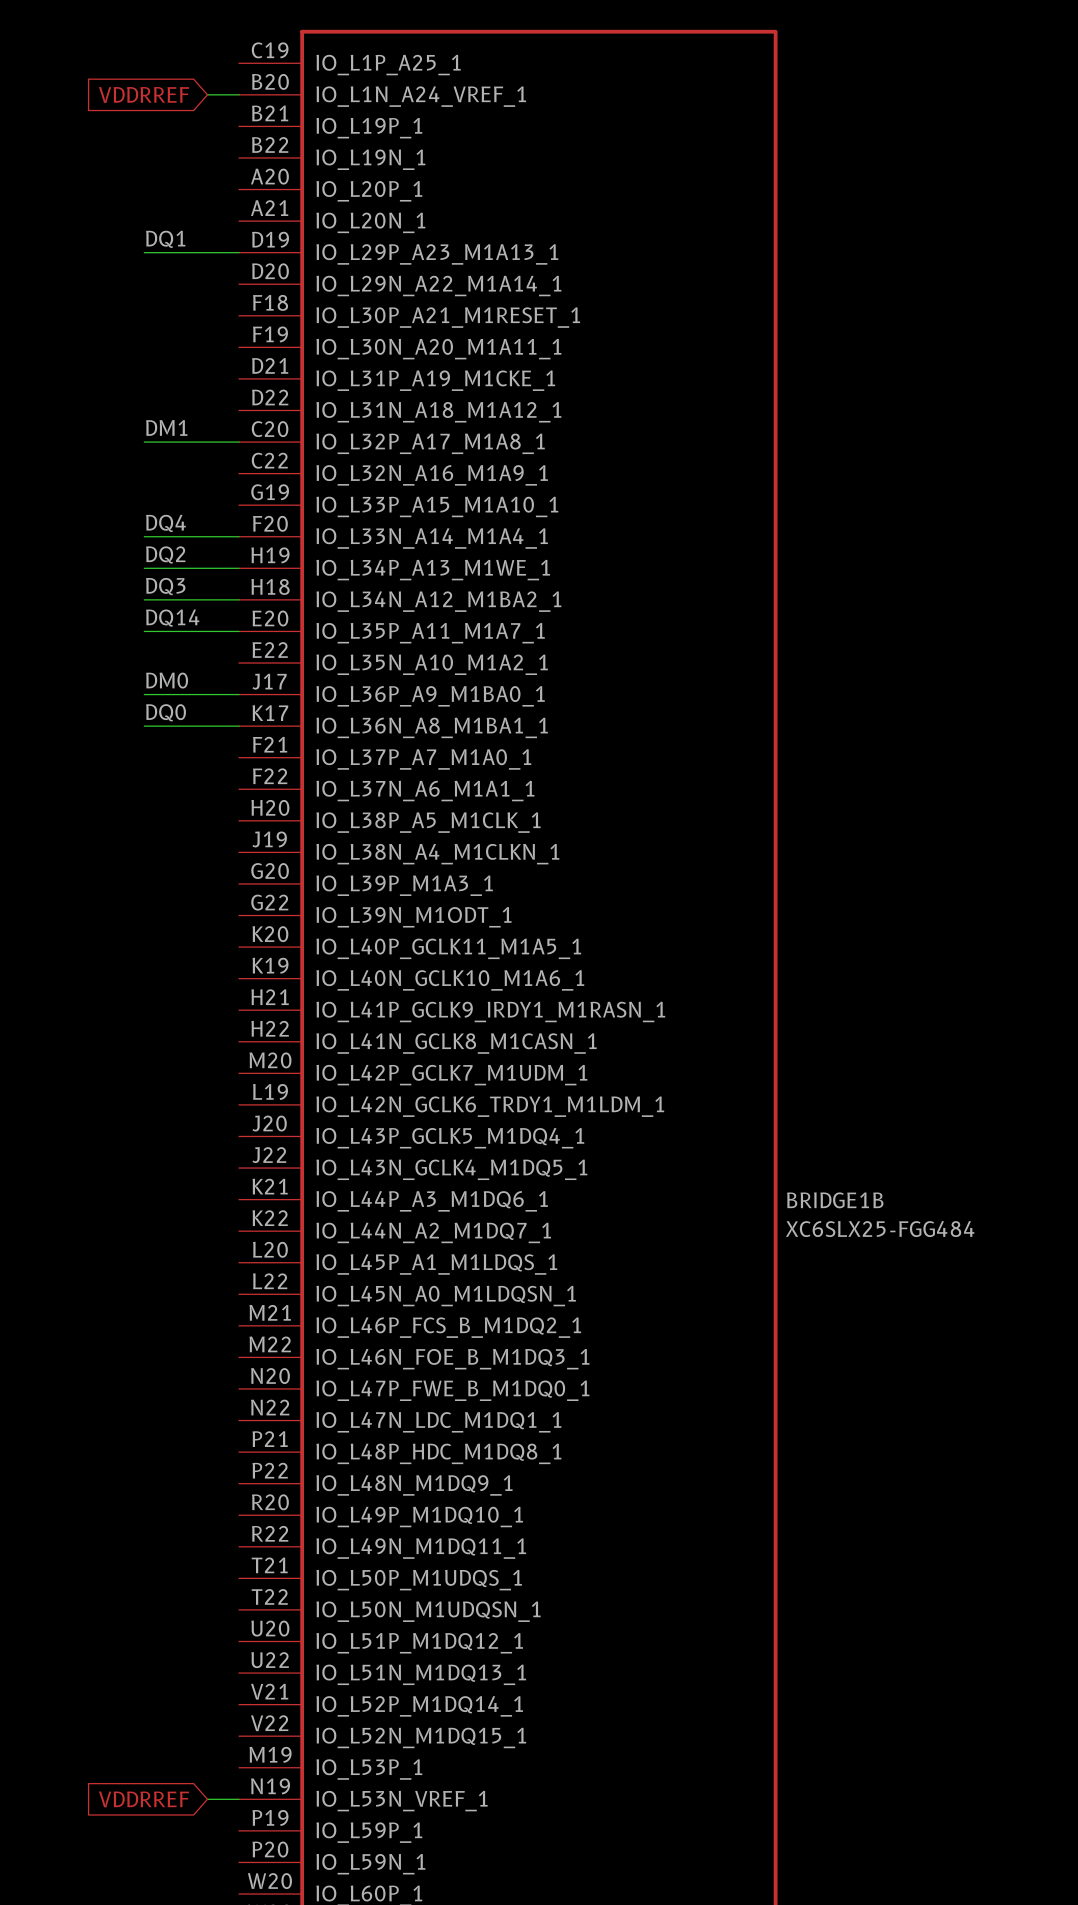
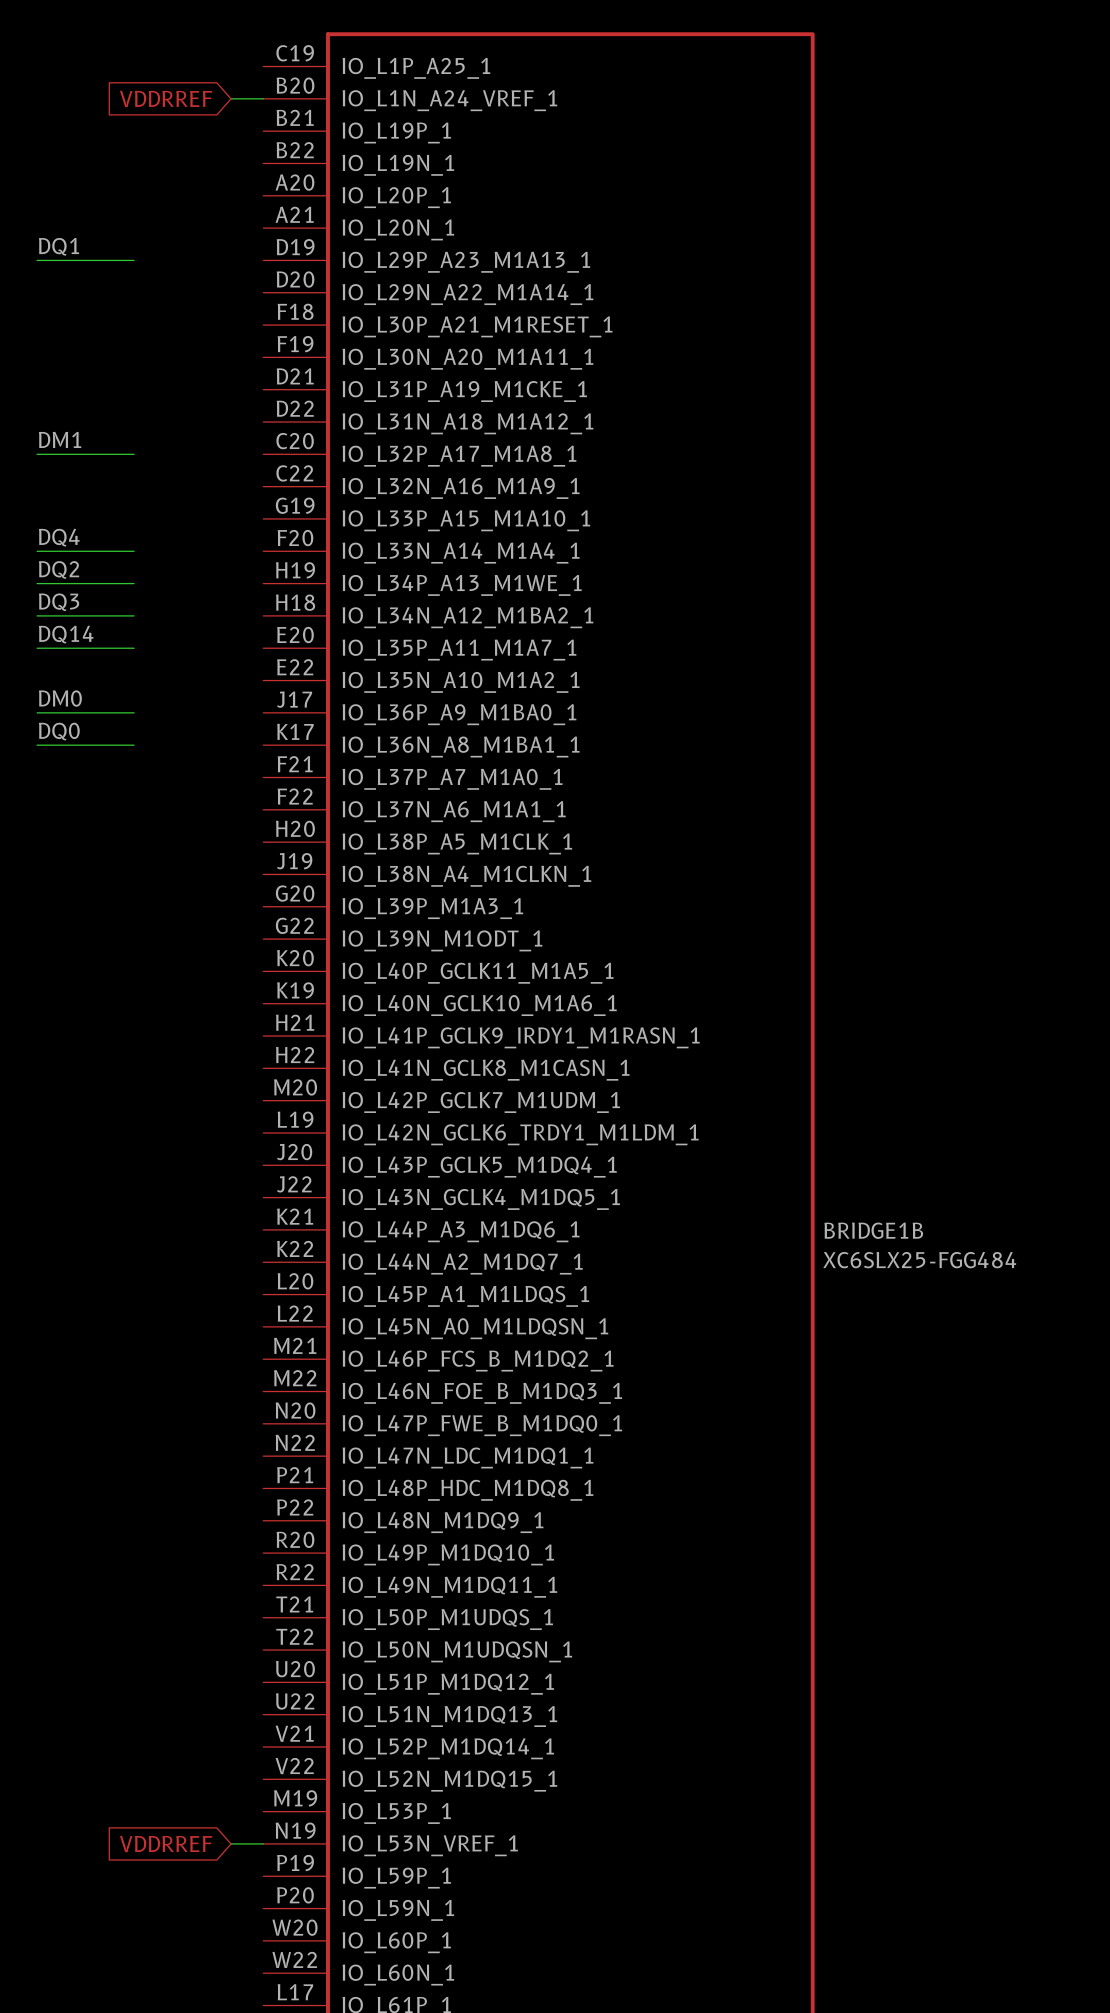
label position: DQ1 (165, 239) -> DQ1 (59, 246)
wire: (144, 252) (239, 252) -> (37, 260) (134, 260)
label position: DM1 (166, 427) -> DM1 (60, 439)
wire: (144, 442) (239, 442) -> (37, 454) (134, 454)
label position: DQ4 (165, 523) -> DQ4 (59, 537)
wire: (144, 536) (239, 536) -> (37, 551) (134, 551)
label position: DQ2 (165, 554) -> DQ2 (59, 569)
wire: (144, 568) (239, 568) -> (37, 583) (134, 583)
label position: DQ3 (165, 586) -> DQ3 (59, 602)
wire: (144, 599) (239, 599) -> (37, 615) (134, 615)
label position: DQ14 (172, 618) -> DQ14 (66, 634)
wire: (144, 631) (239, 631) -> (37, 648) (134, 648)
label position: DM0 (167, 680) -> DM0 (60, 698)
wire: (144, 694) (239, 694) -> (37, 712) (134, 712)
label position: DQ0 (166, 712) -> DQ0 (59, 731)
wire: (144, 726) (239, 726) -> (37, 745) (134, 745)

